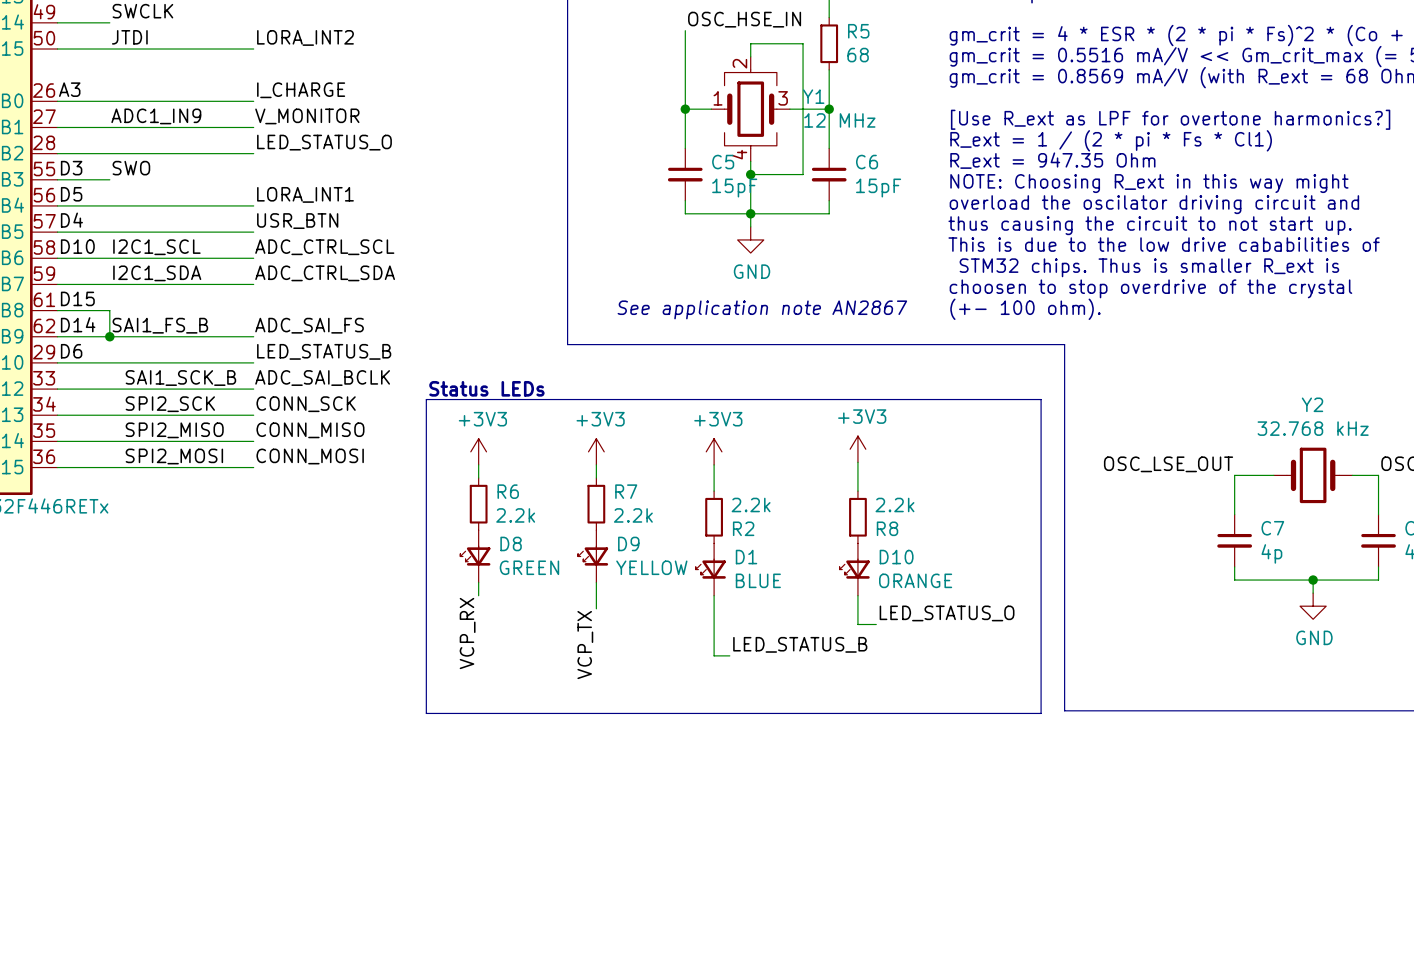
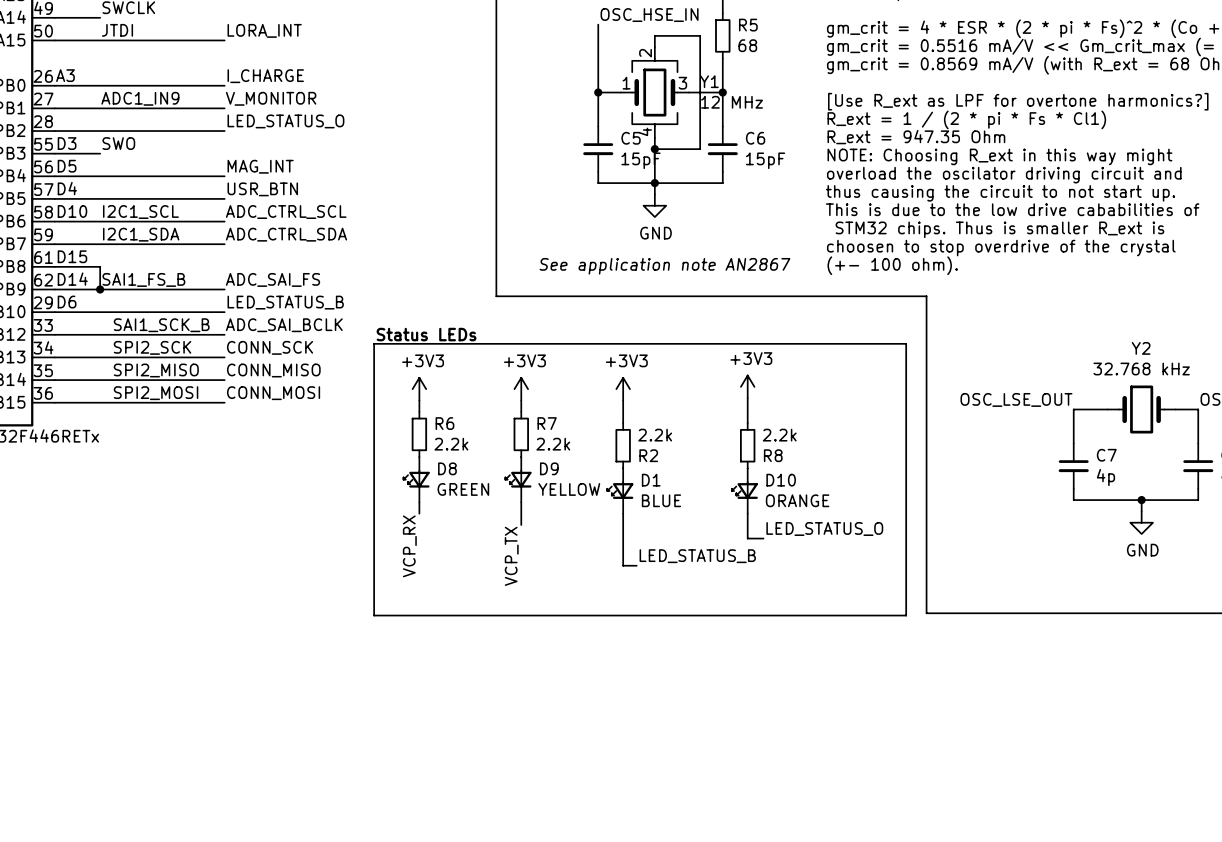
label: LORA_INT2 (305, 37) -> LORA_INT (264, 30)
label: LORA_INT1 (305, 194) -> MAG_INT (260, 166)

